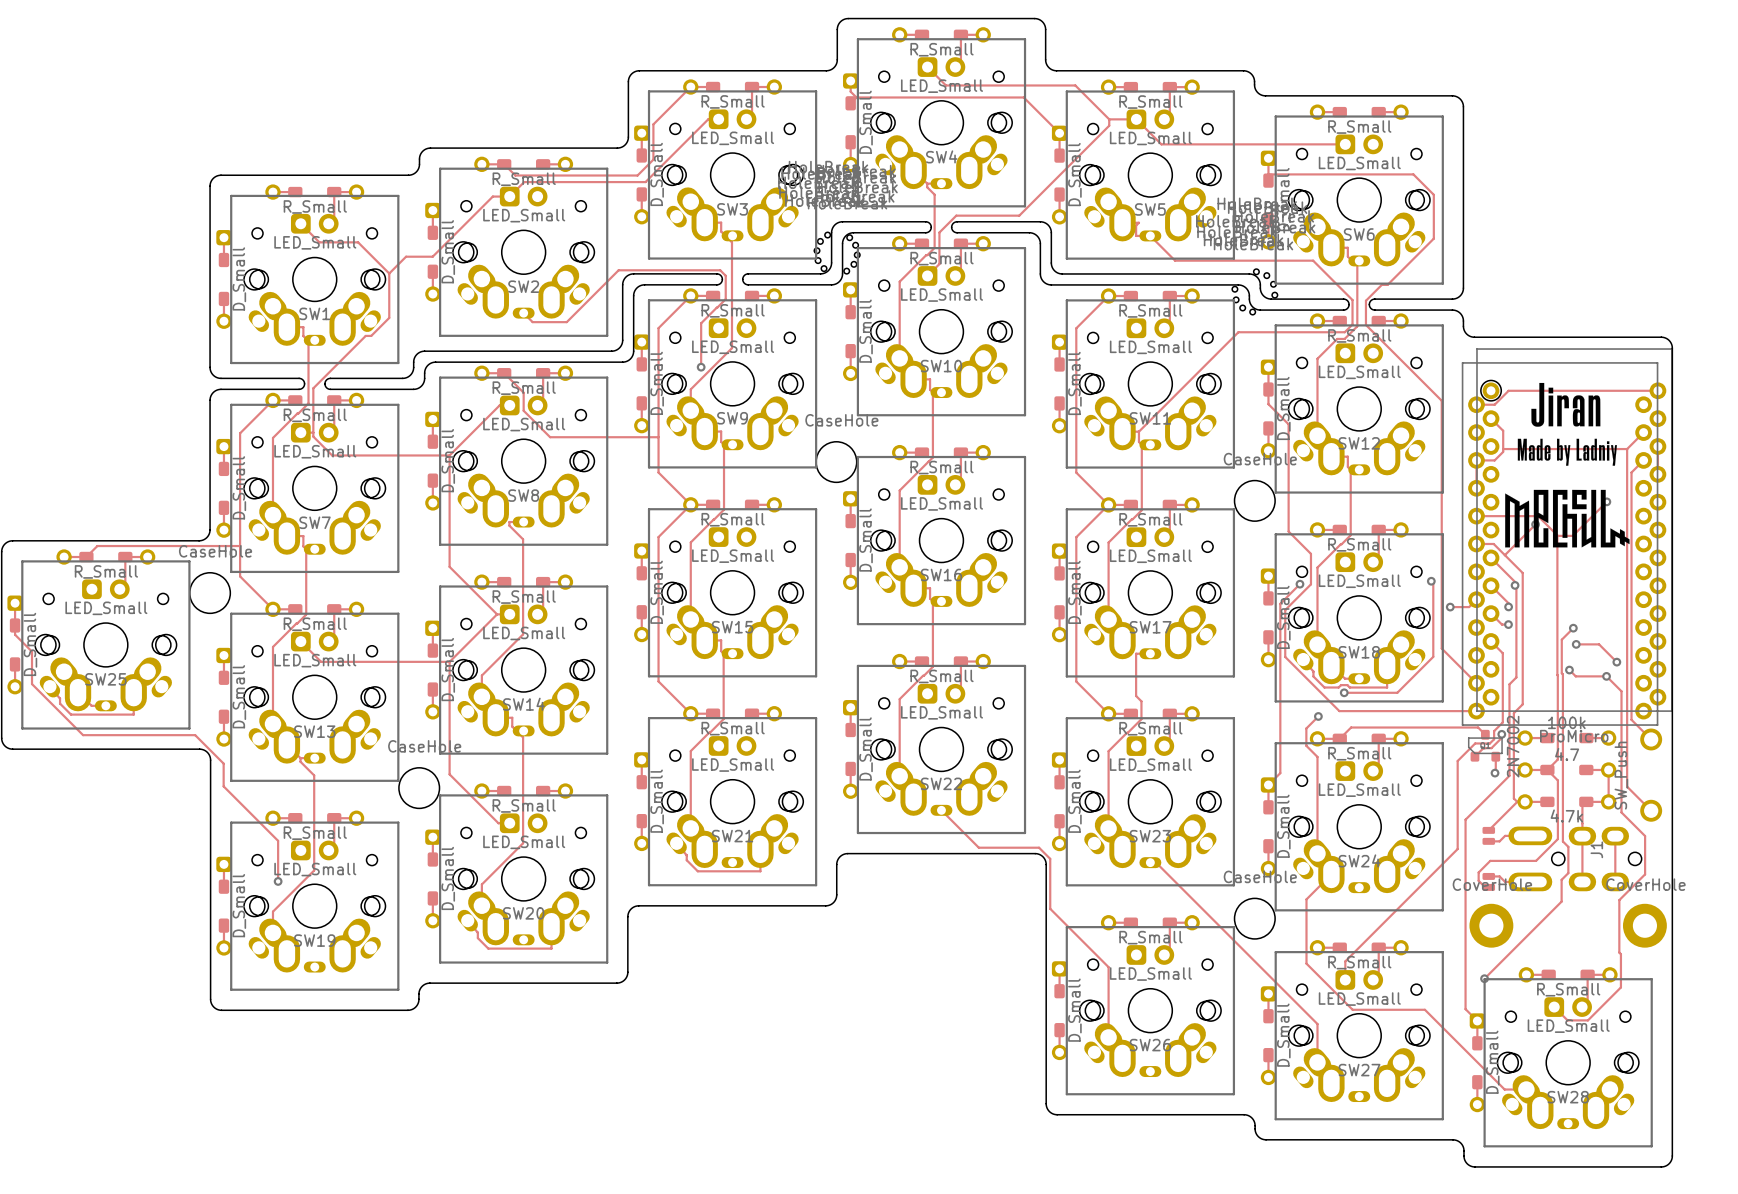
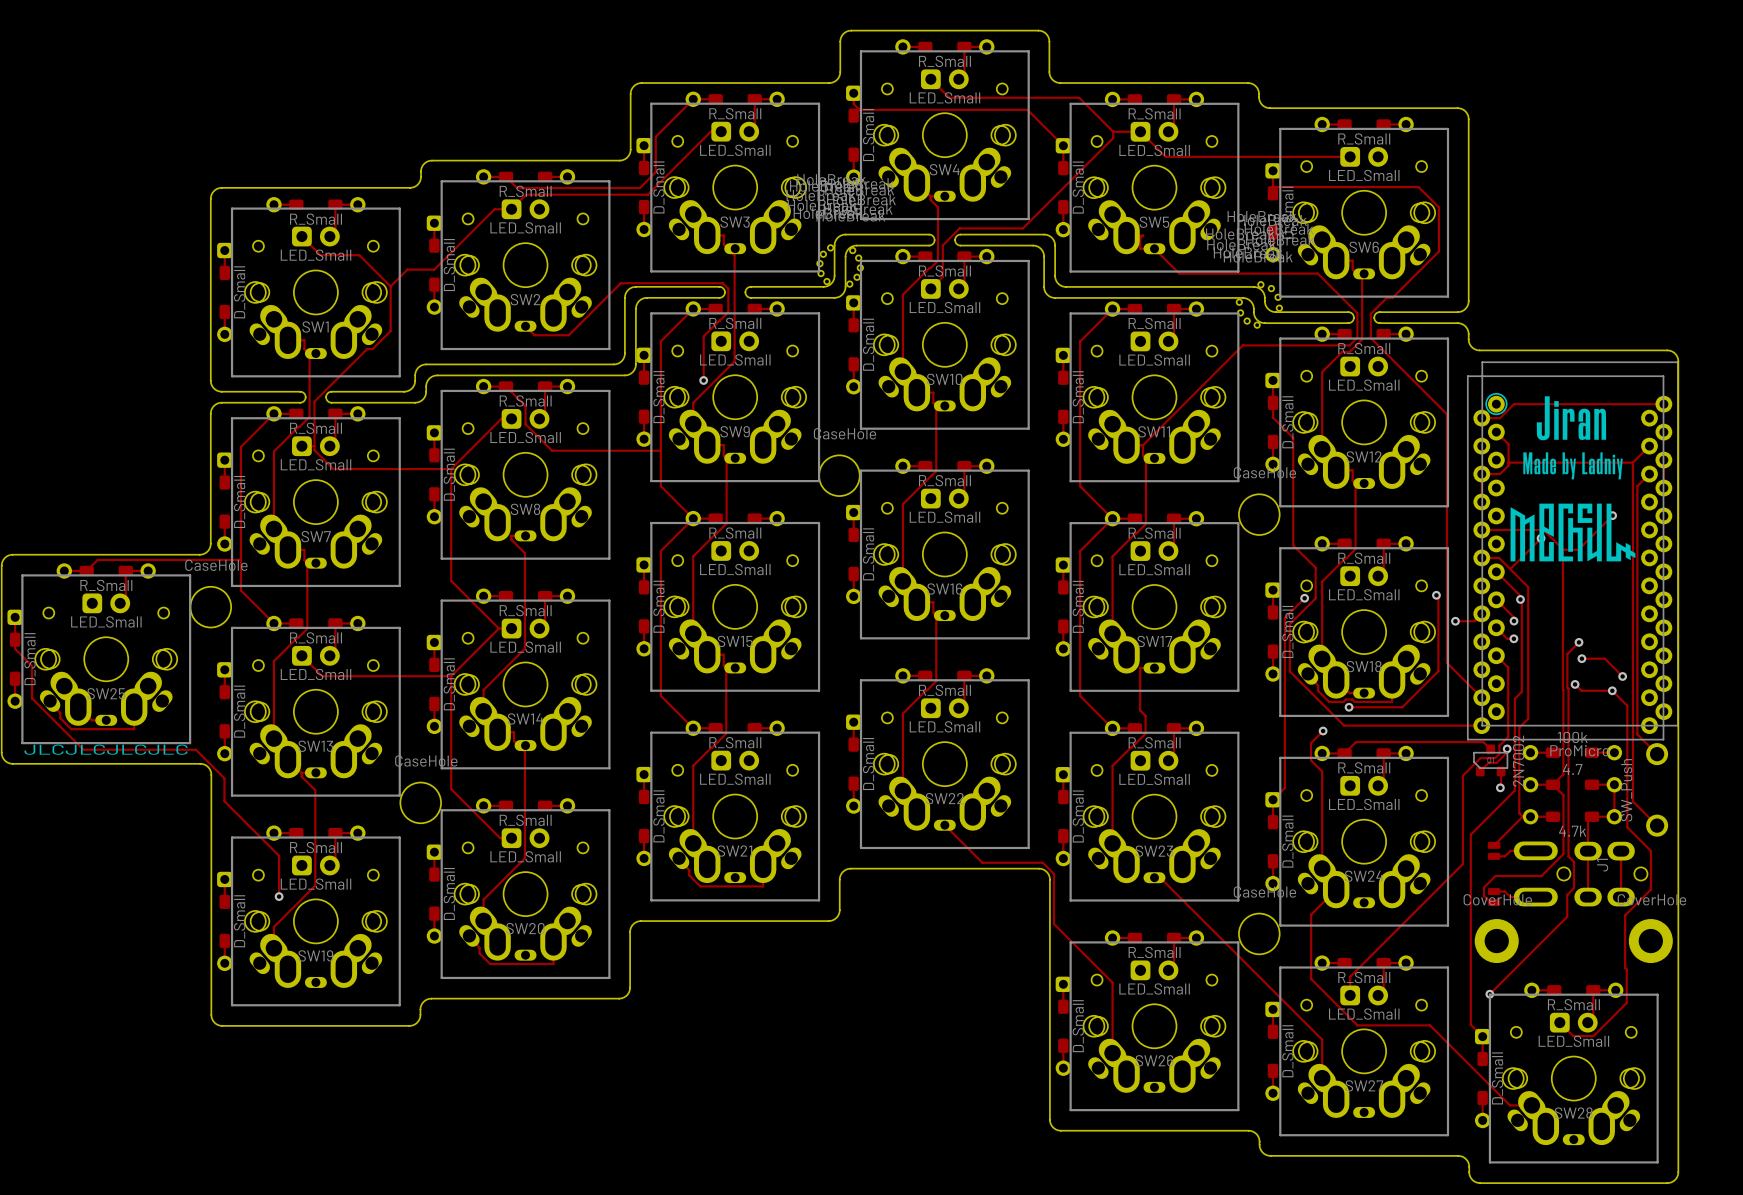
text: none -> JLCJLCJLCJLC (106, 749)

